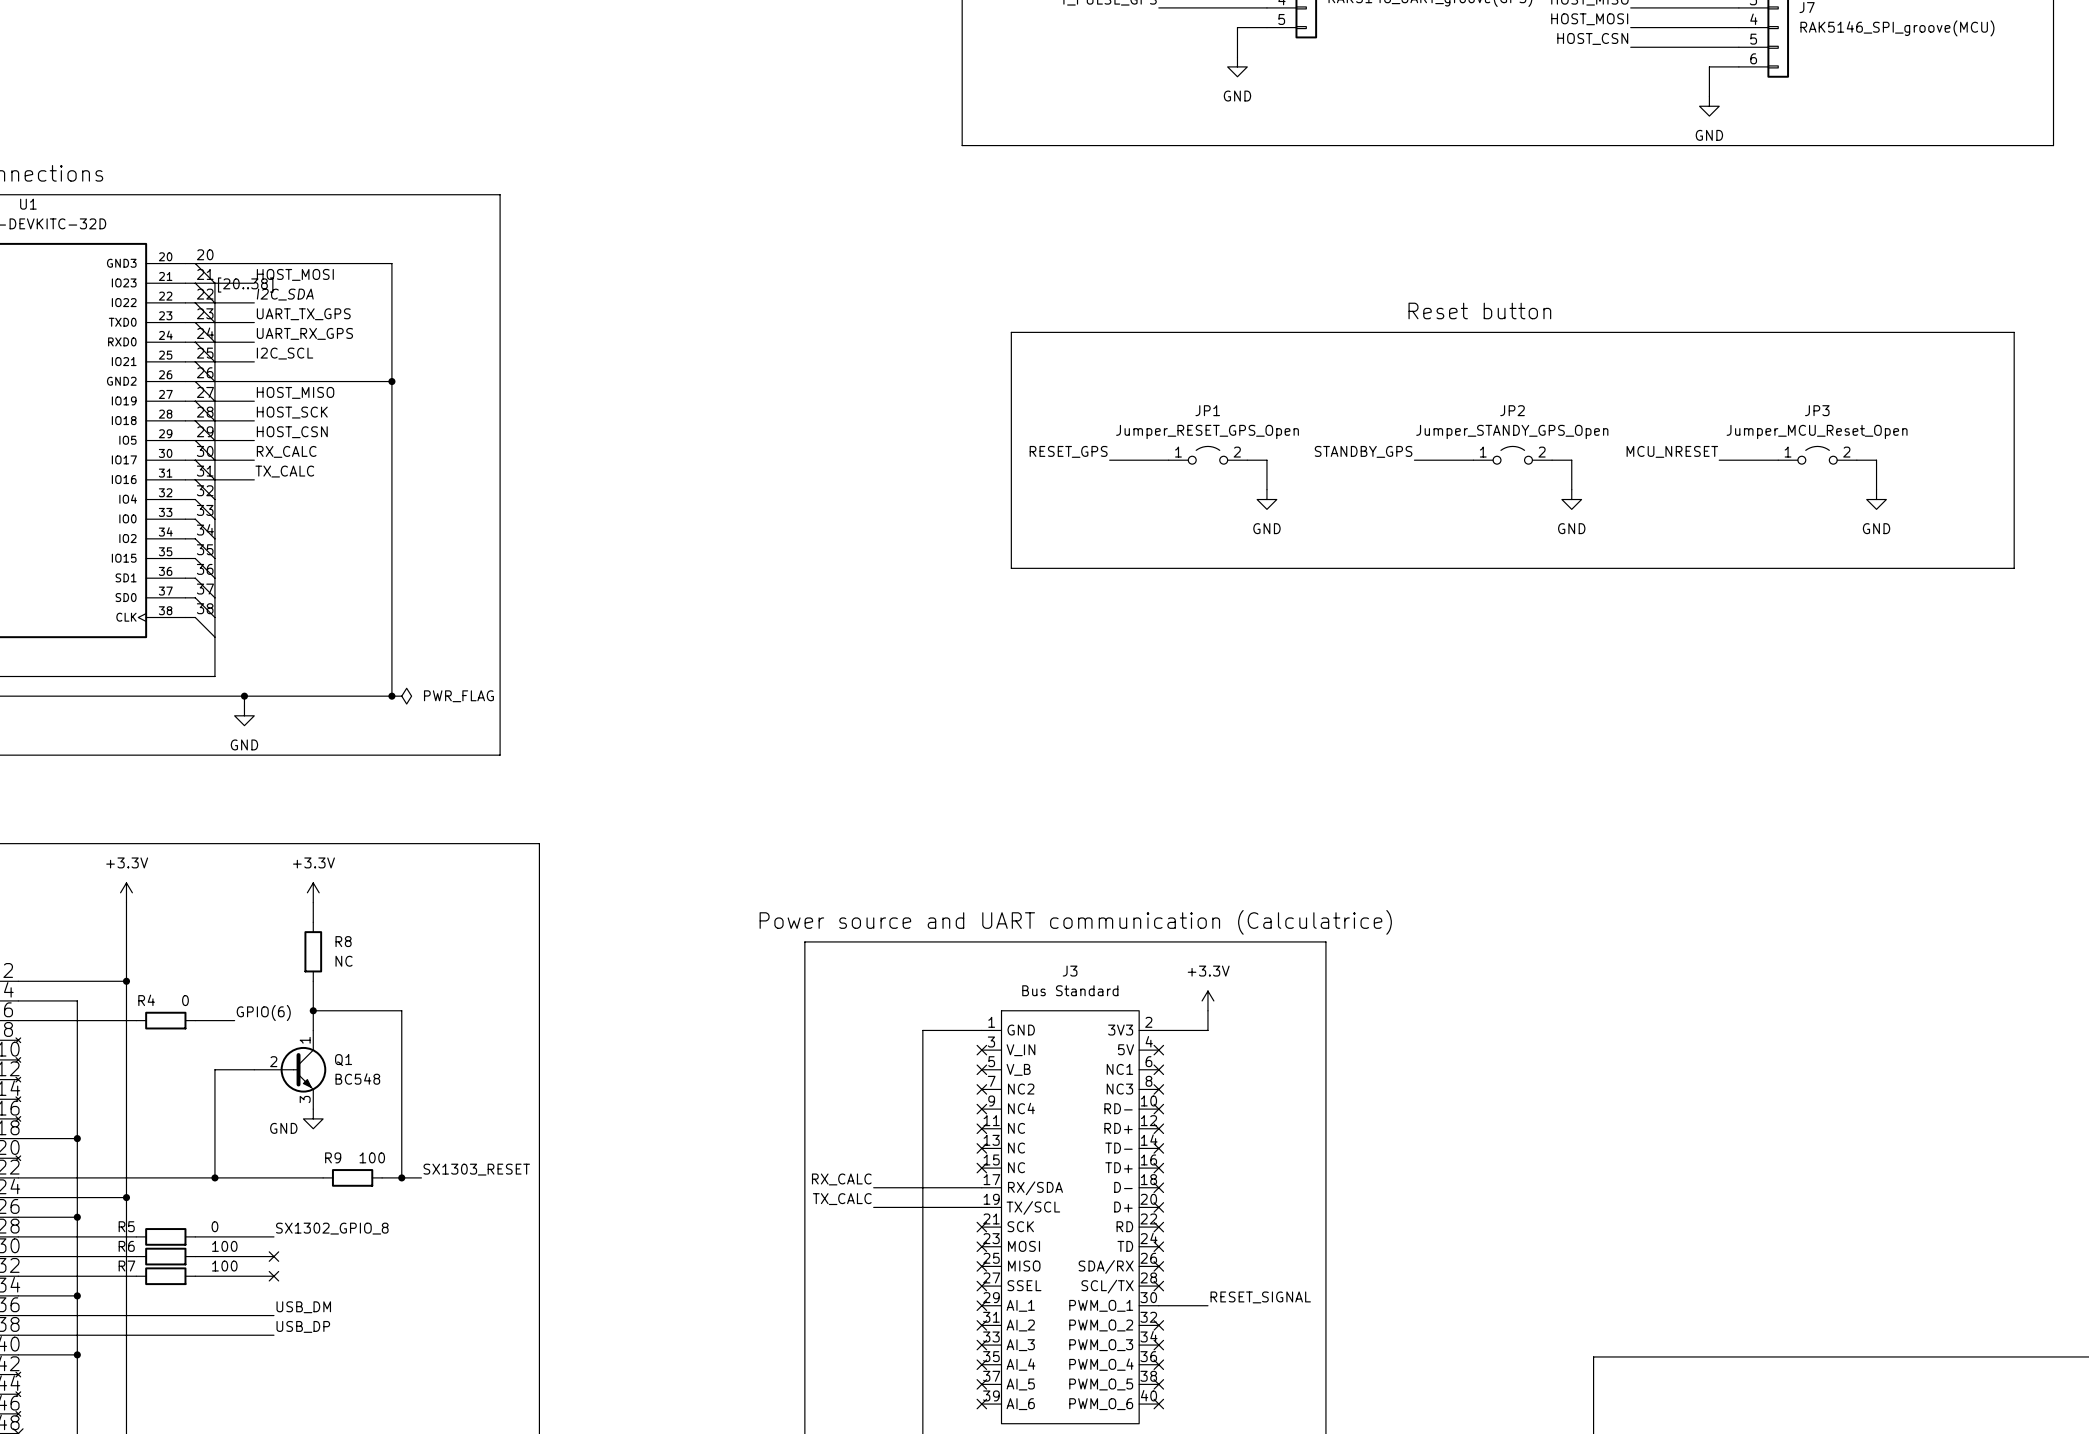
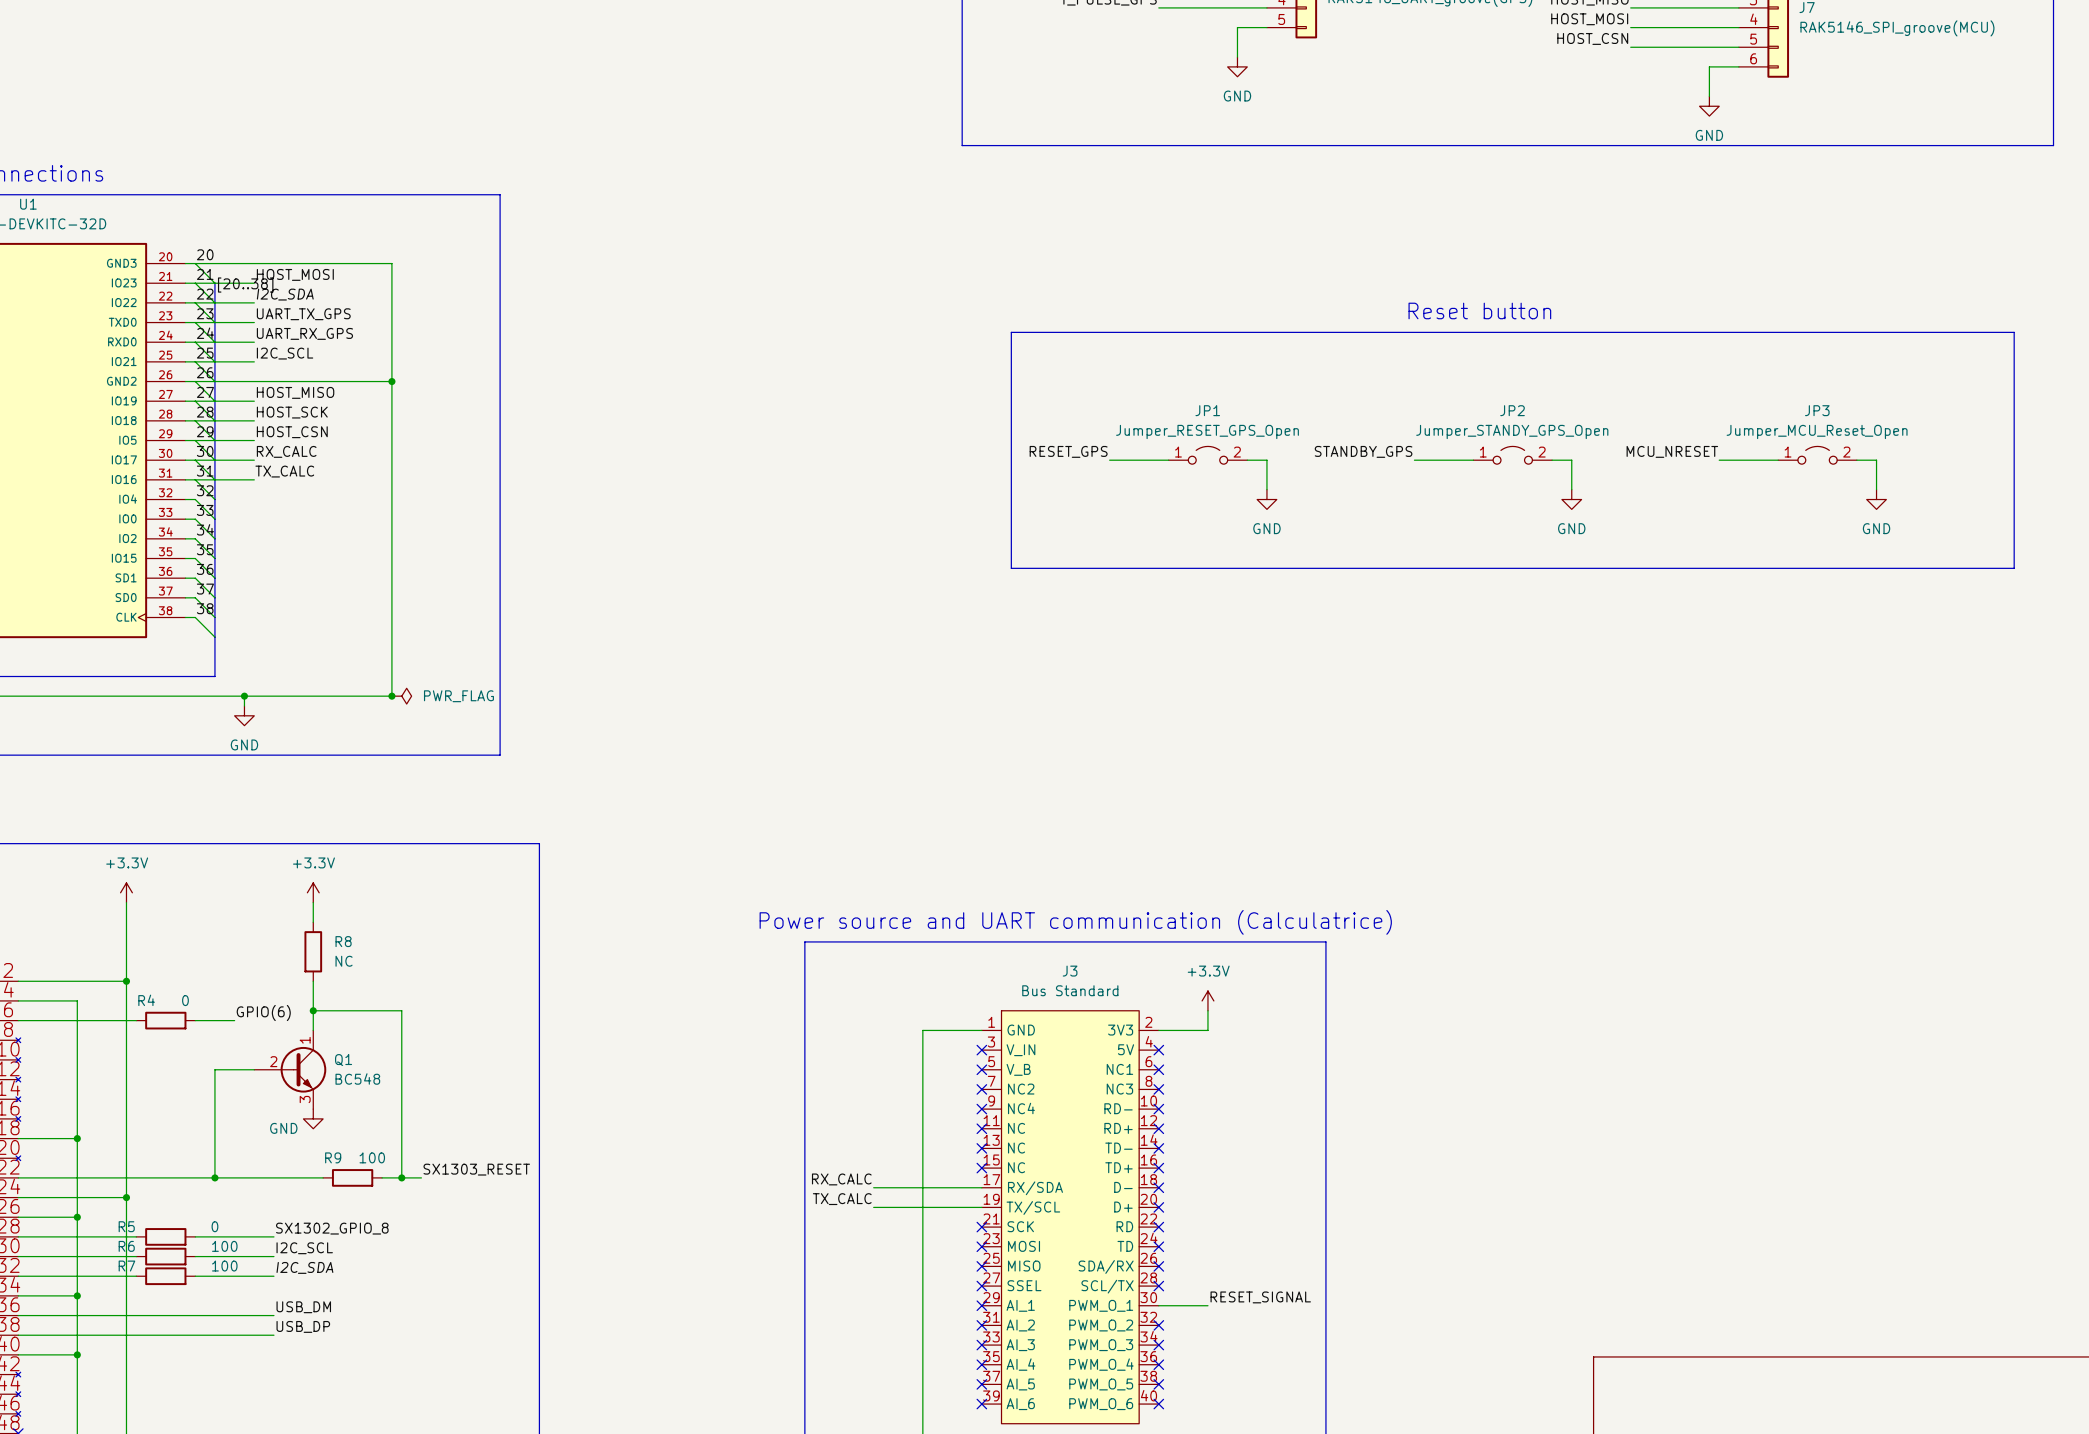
label: none -> I2C_SCL (304, 1248)
no-connect mark: (273, 1256) -> none
label: none -> I2C_SDA (304, 1267)
no-connect mark: (273, 1276) -> none

